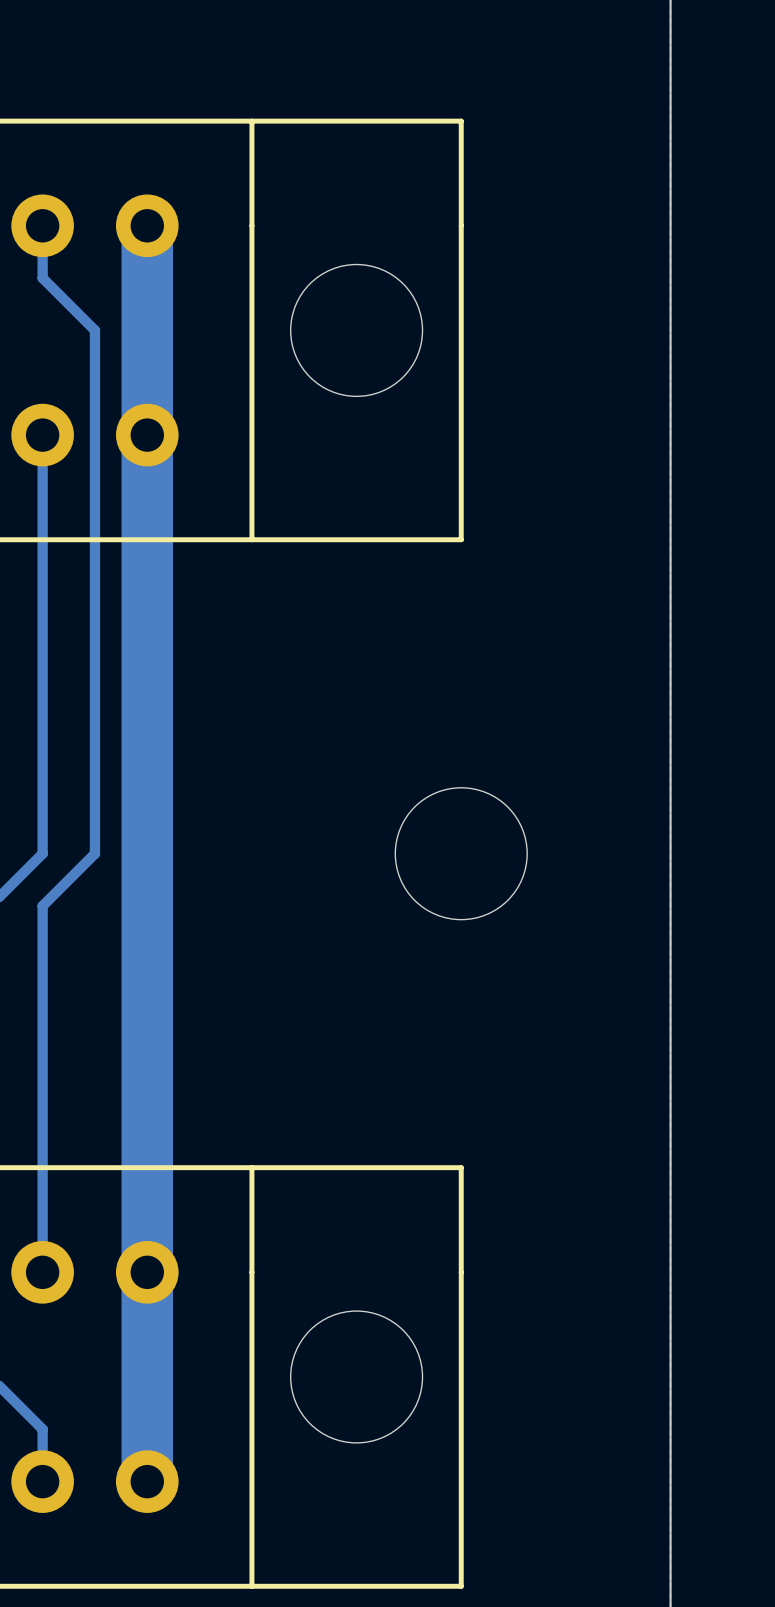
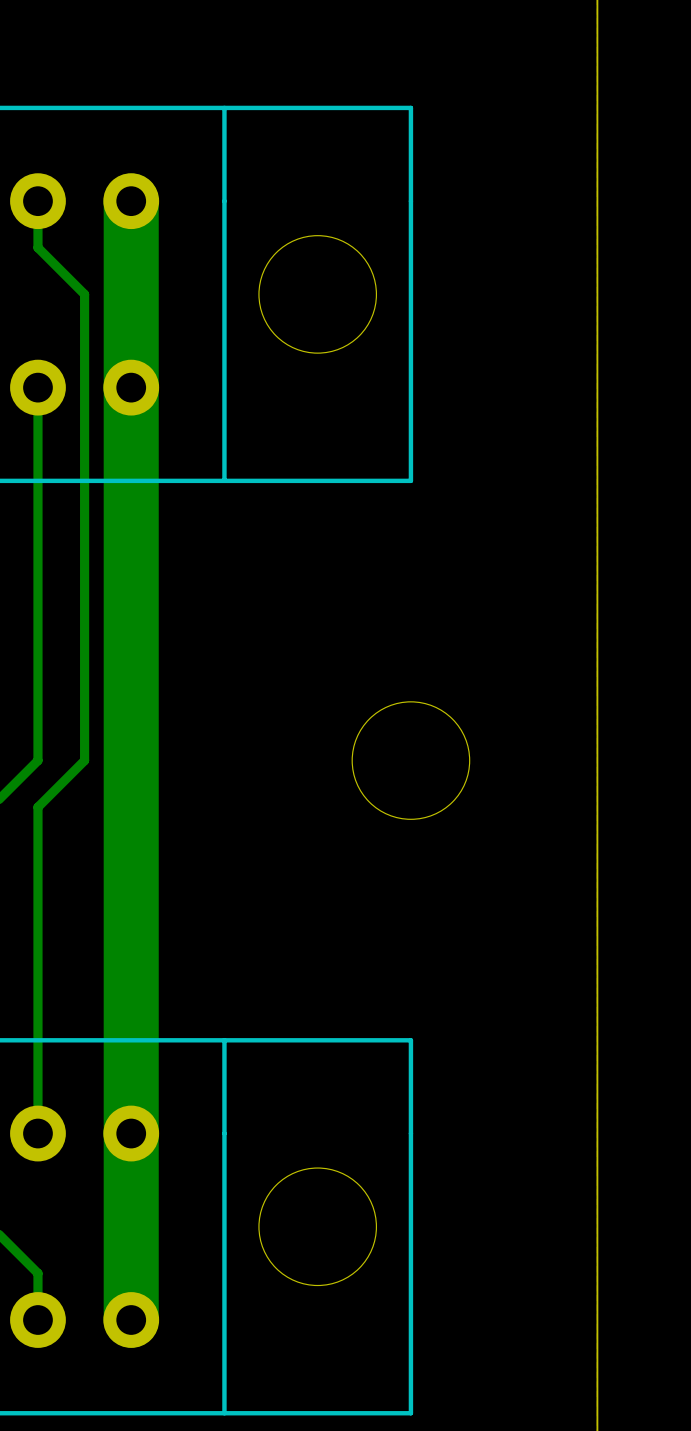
bottom track width: thin (147, 225) (147, 1481) -> thick (131, 201) (131, 1320)

